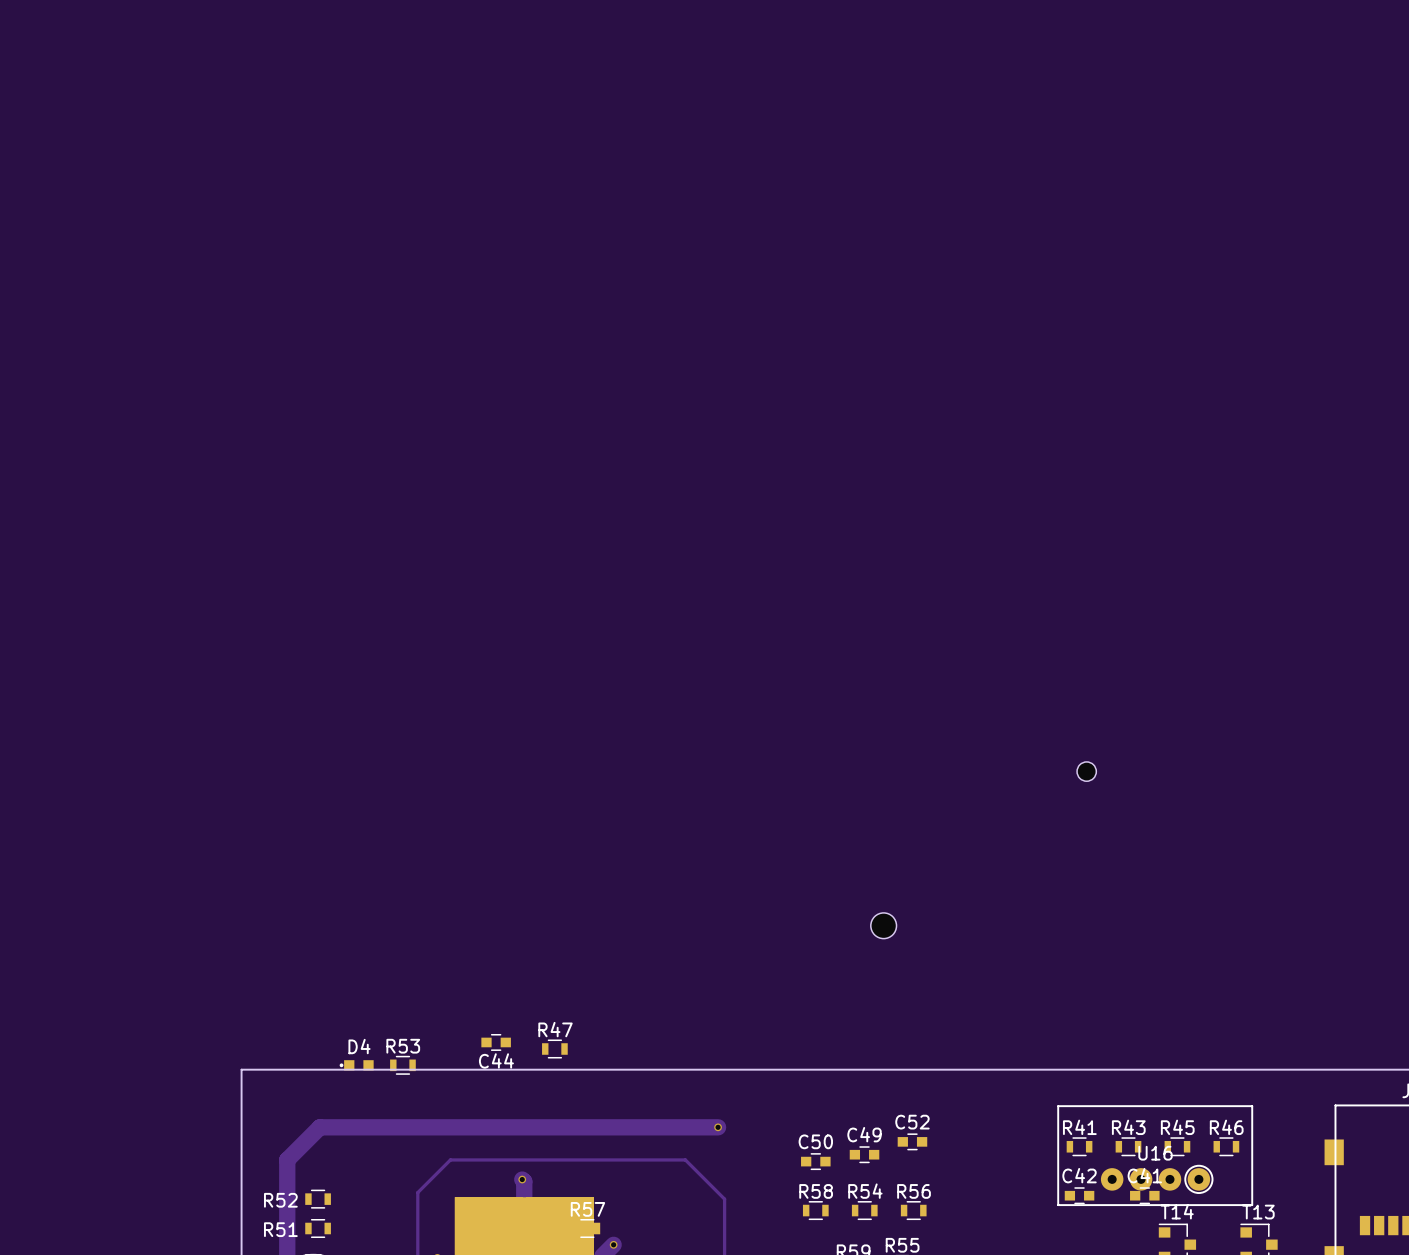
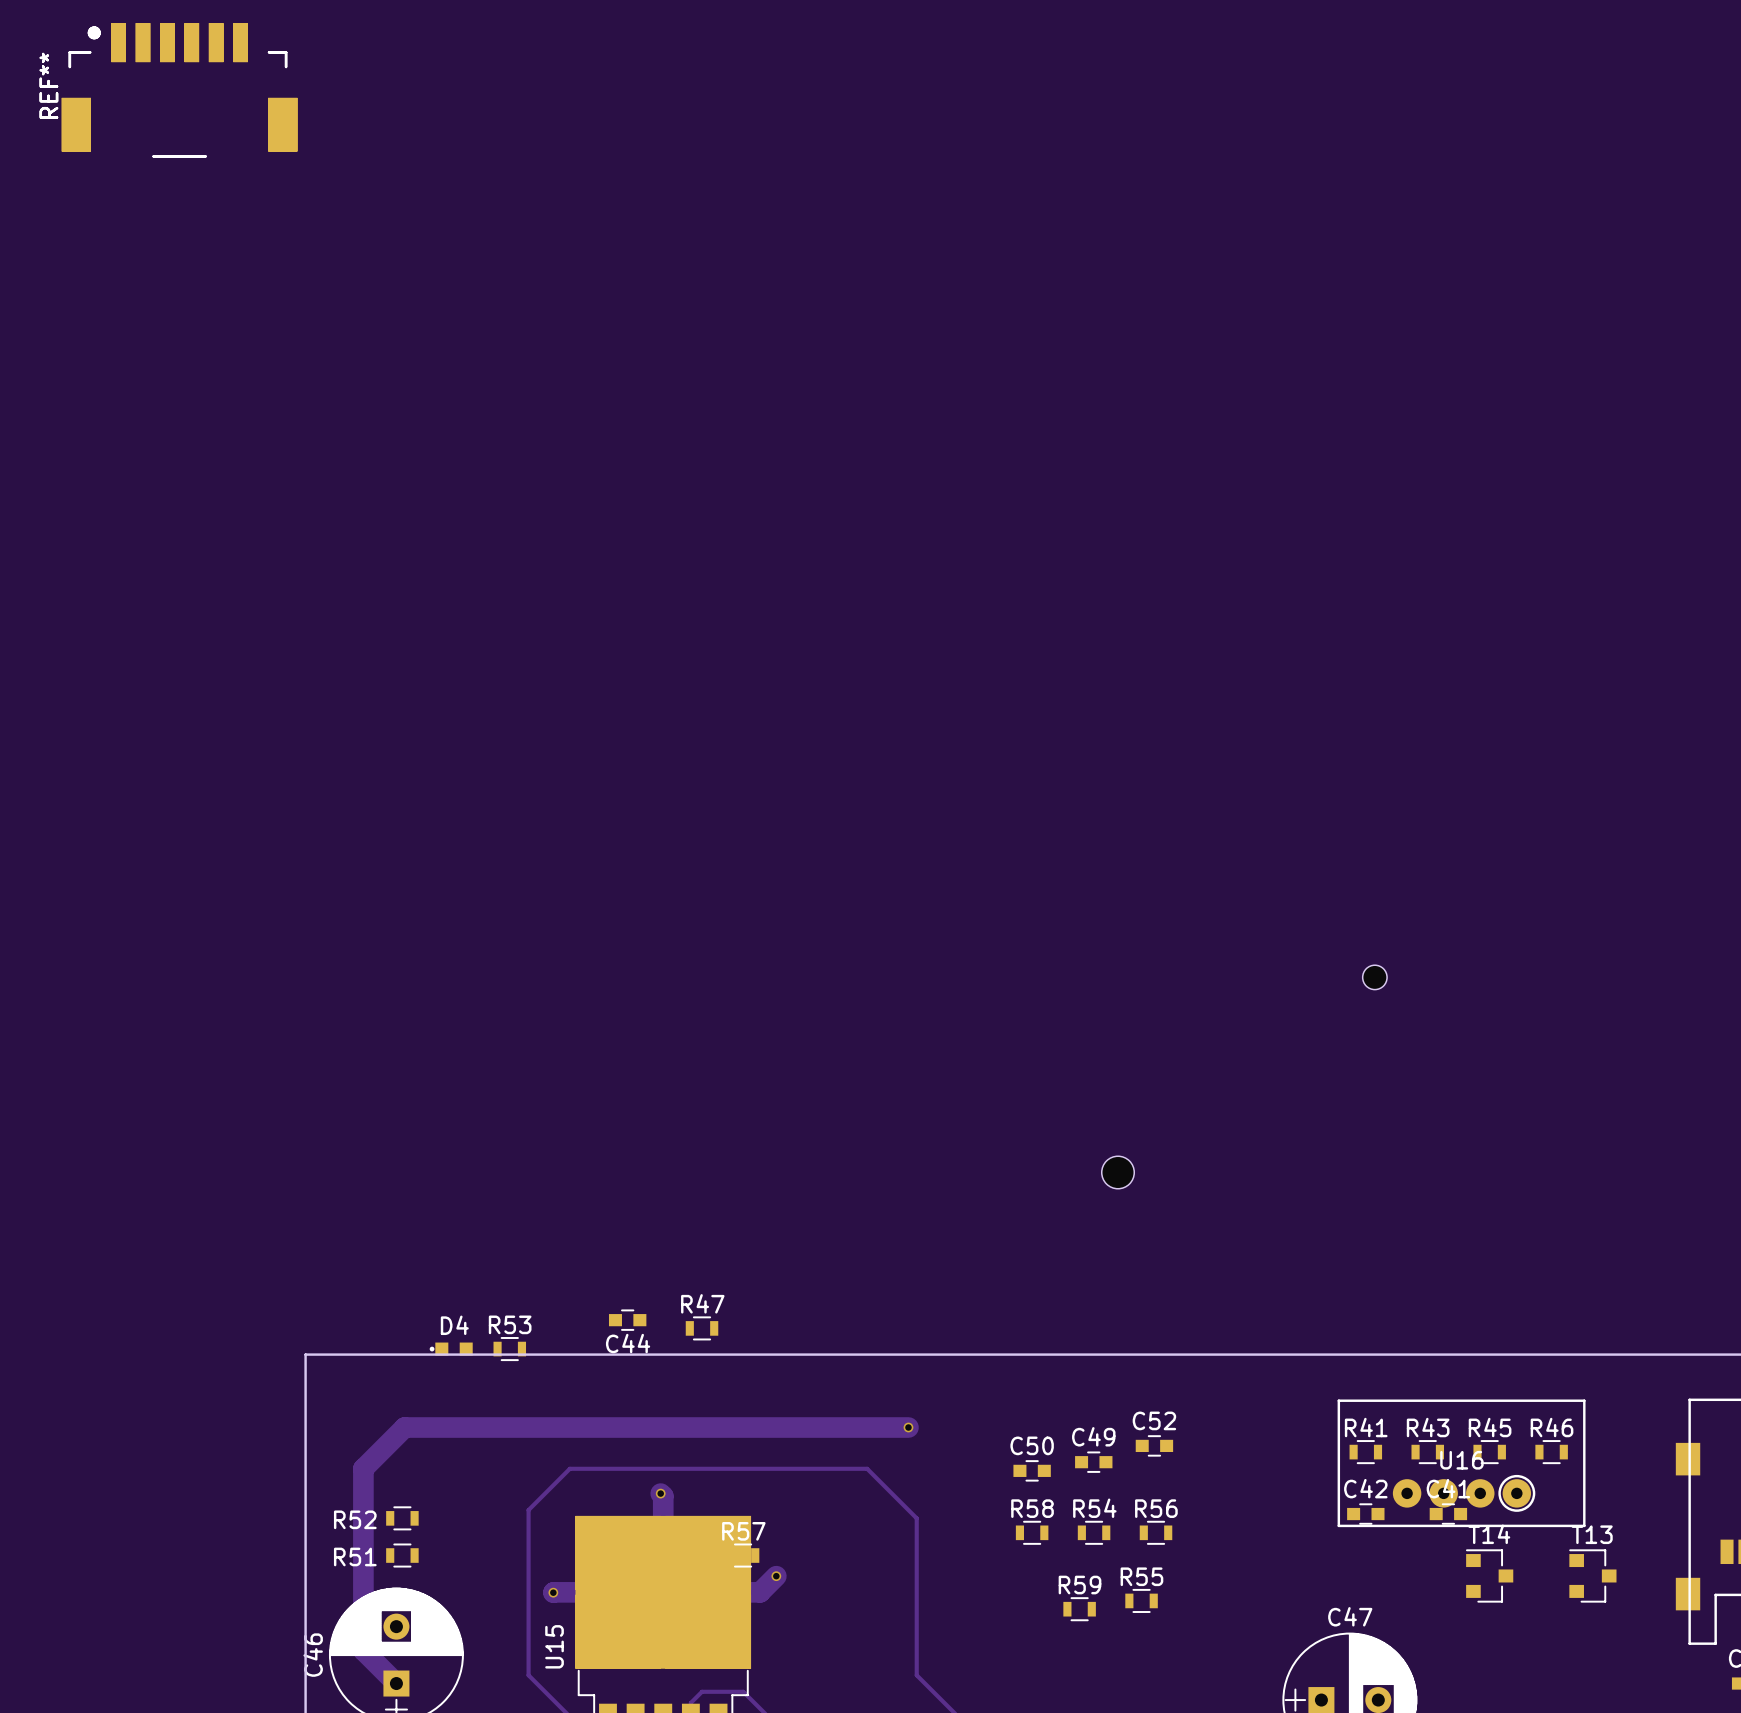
REF**: none -> (179, 90)

